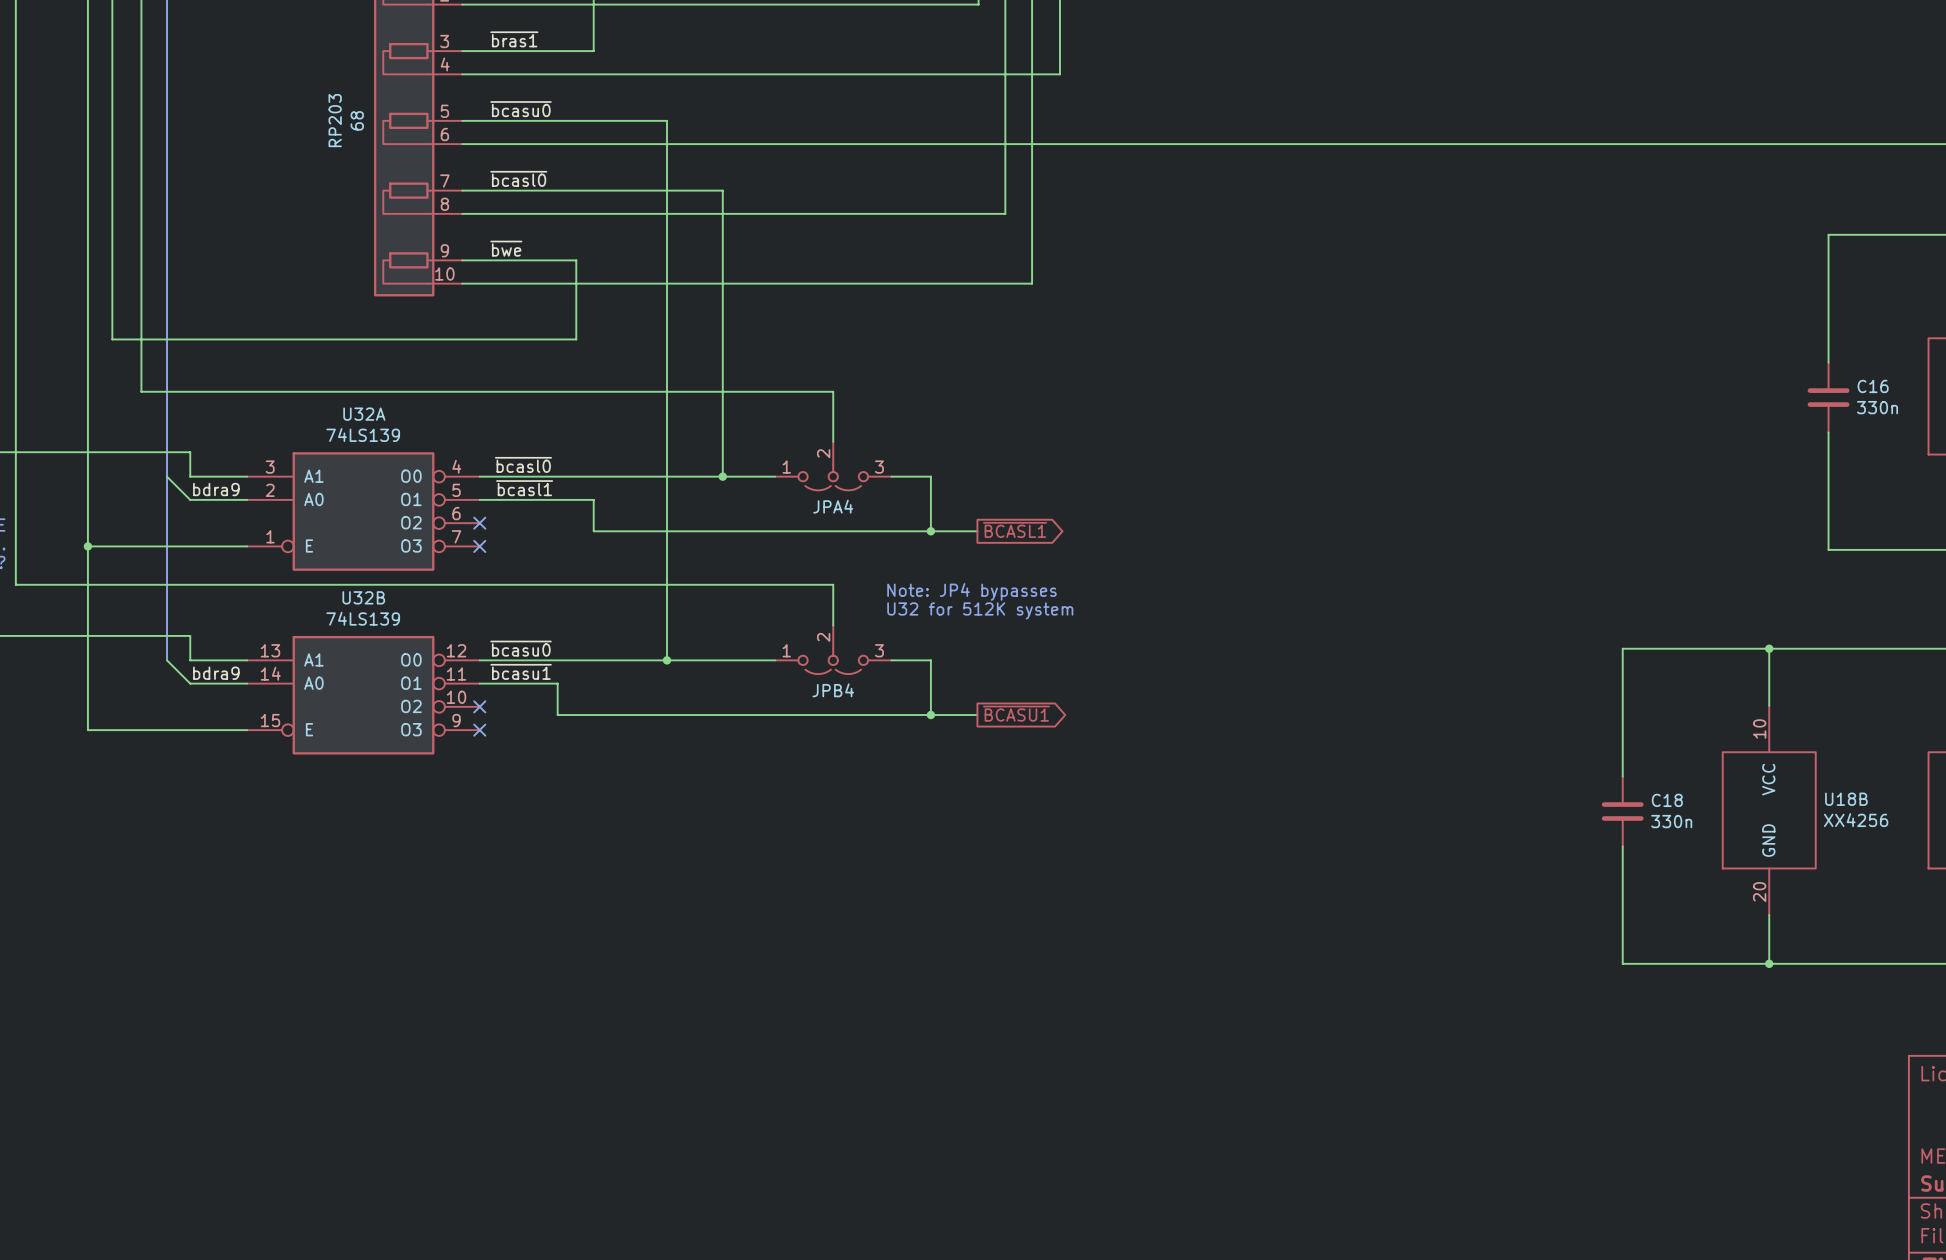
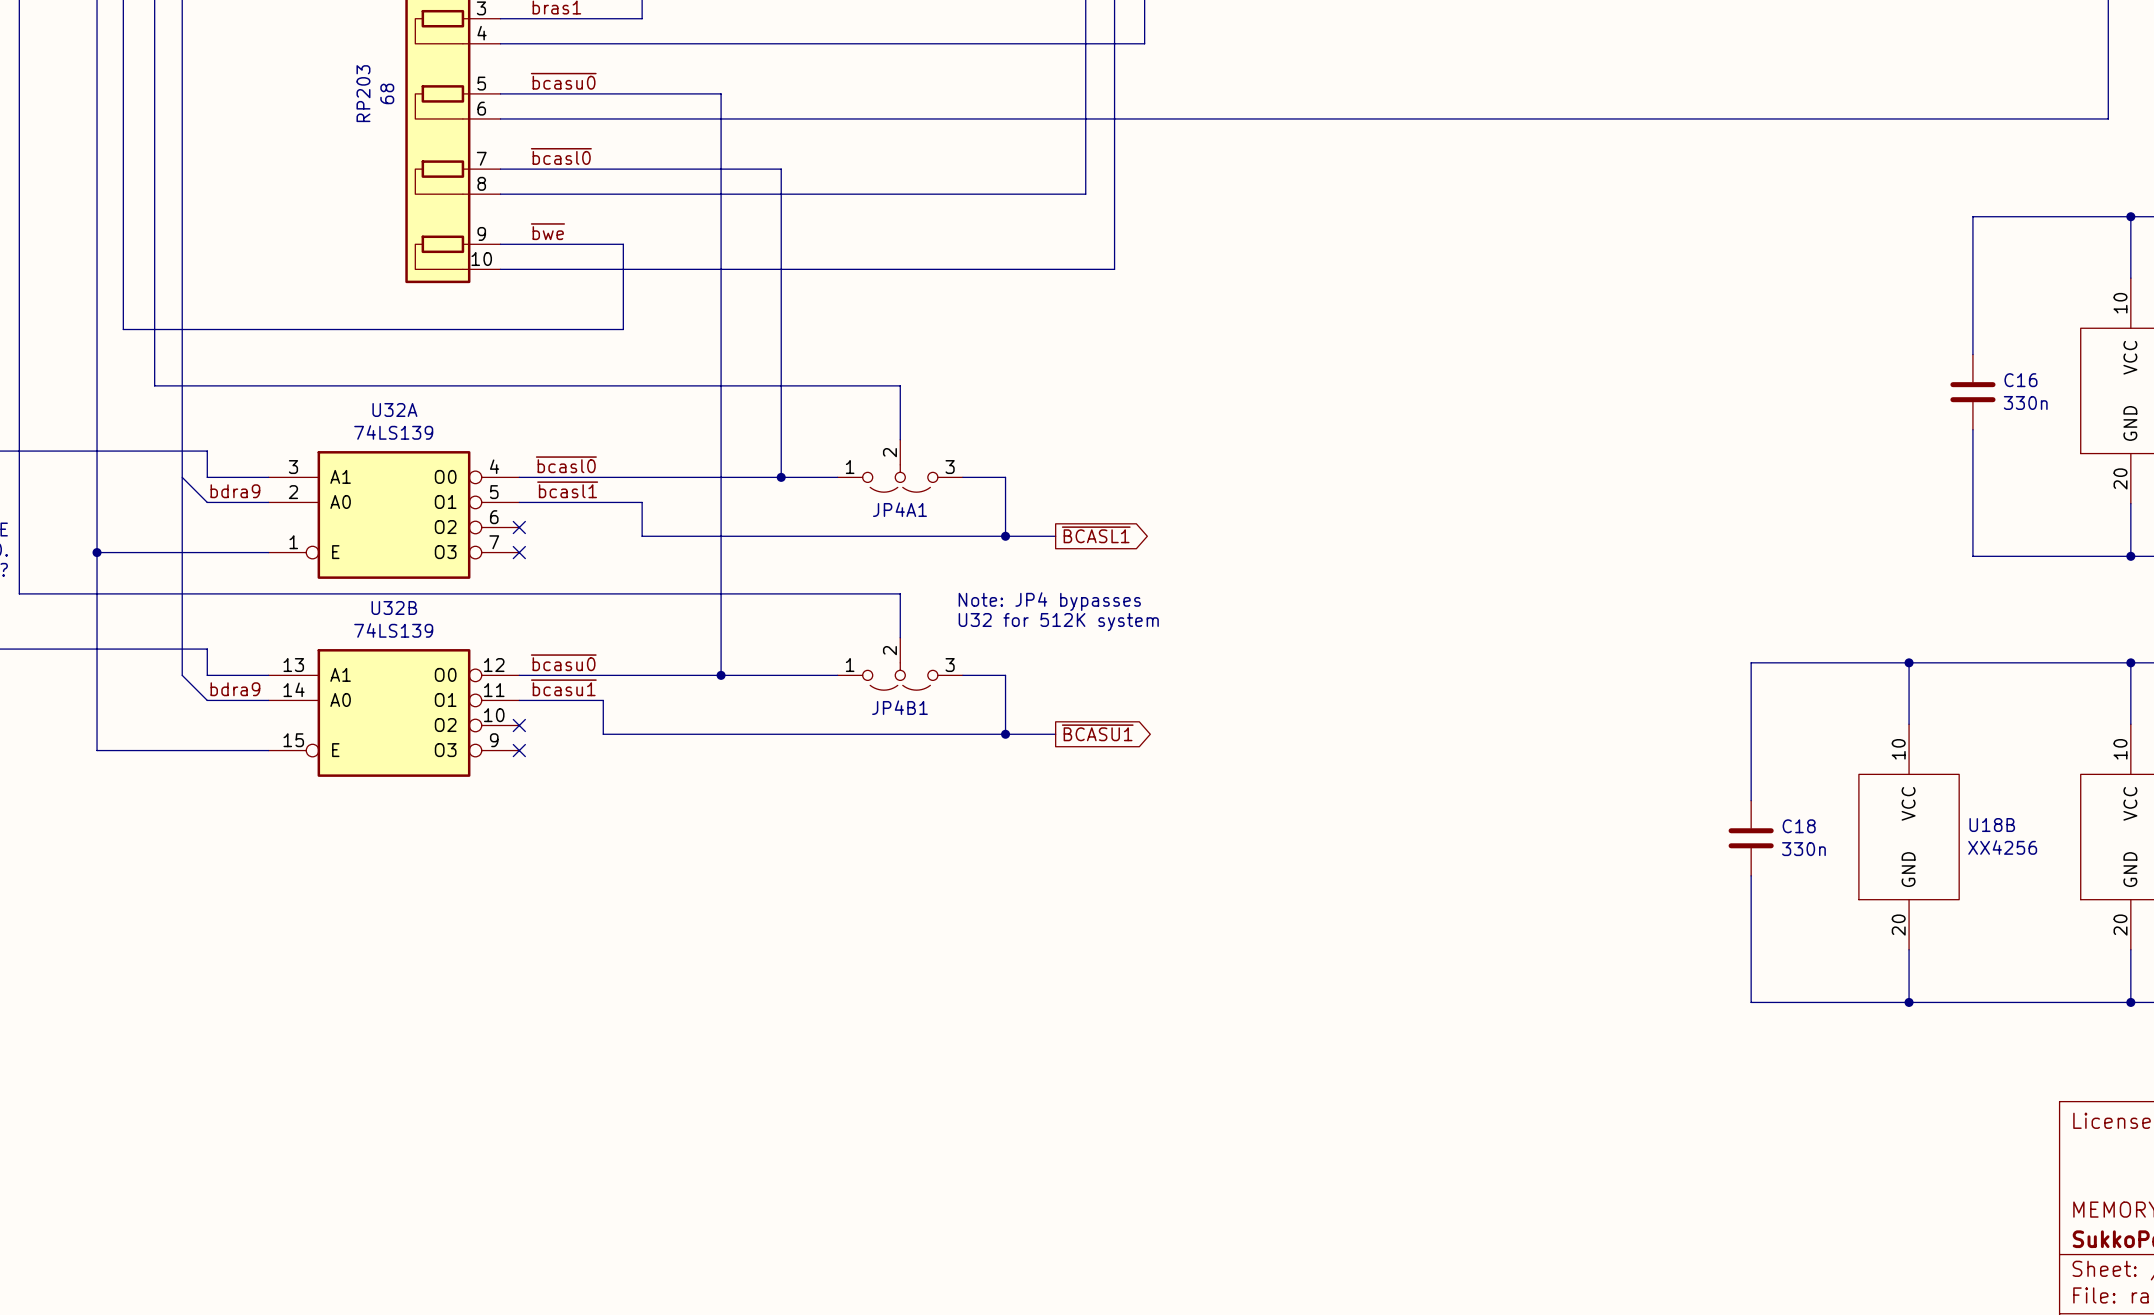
JPA4 name: JPA4 (833, 506) -> JP4A1 (899, 509)
JPB4 name: JPB4 (833, 690) -> JP4B1 (899, 707)

